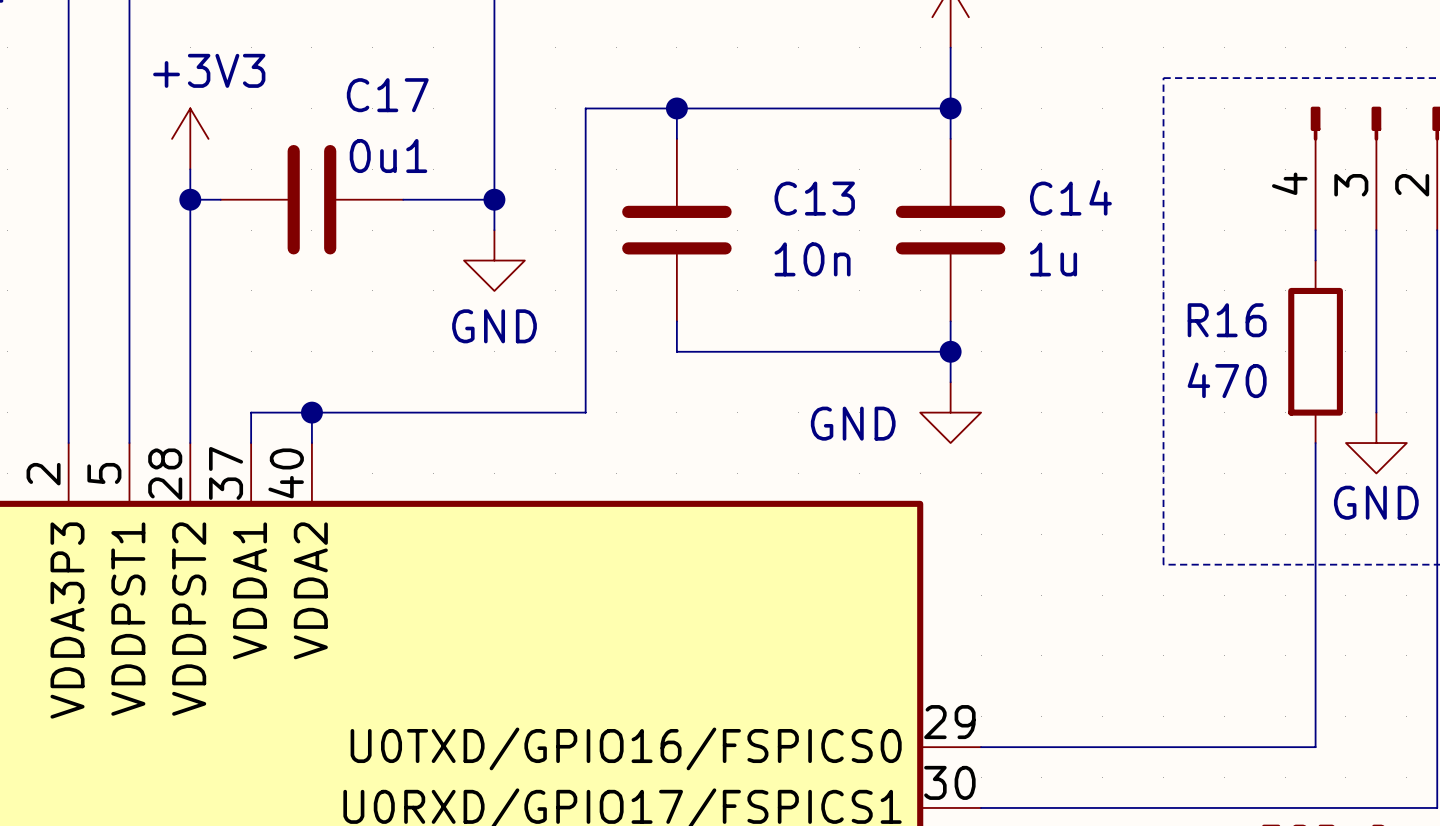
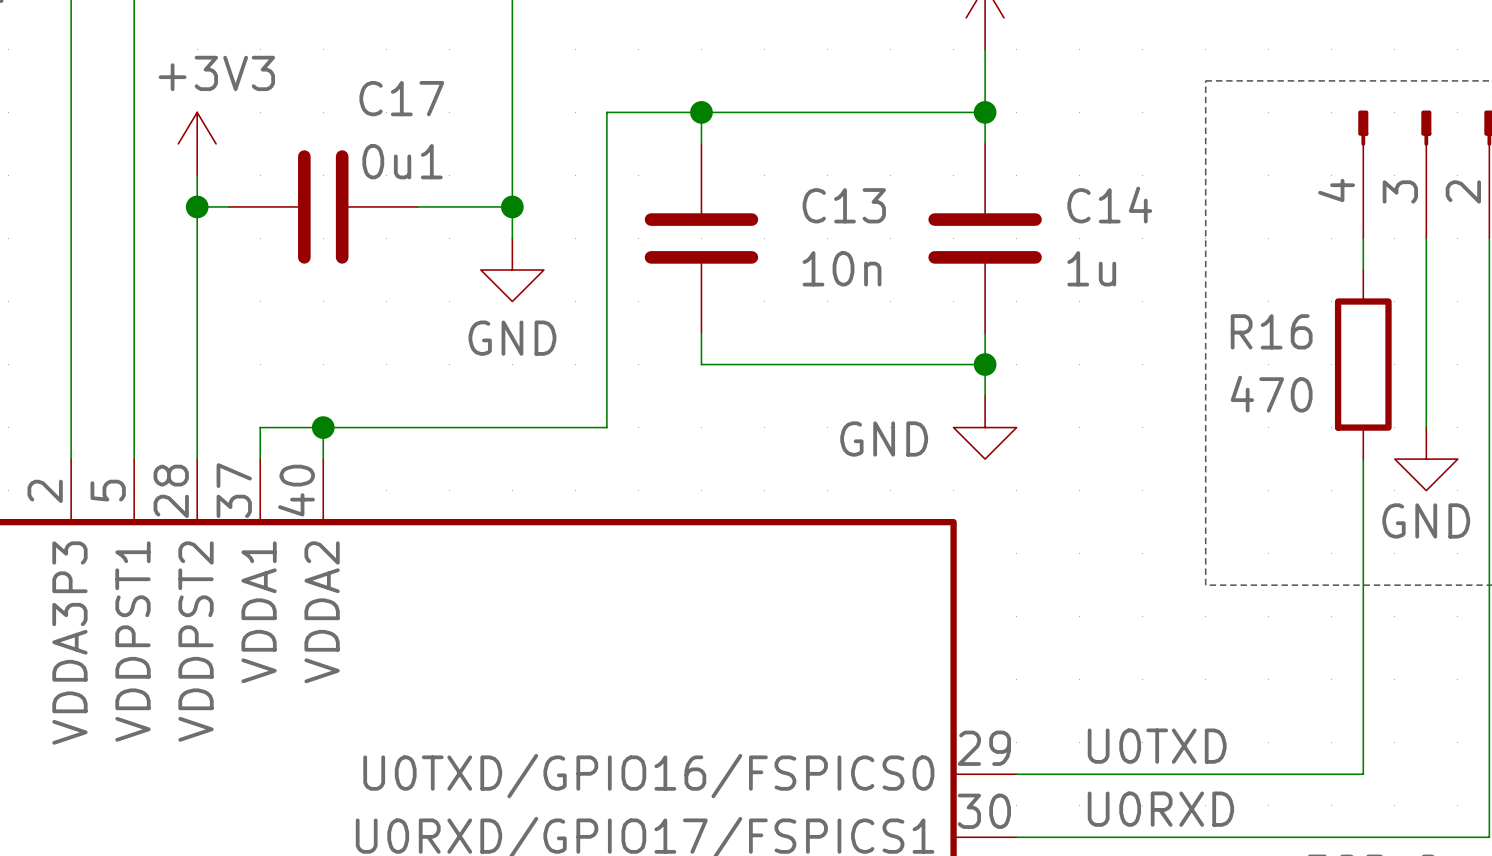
label: none -> U0TXD (1157, 746)
label: none -> U0RXD (1160, 809)

